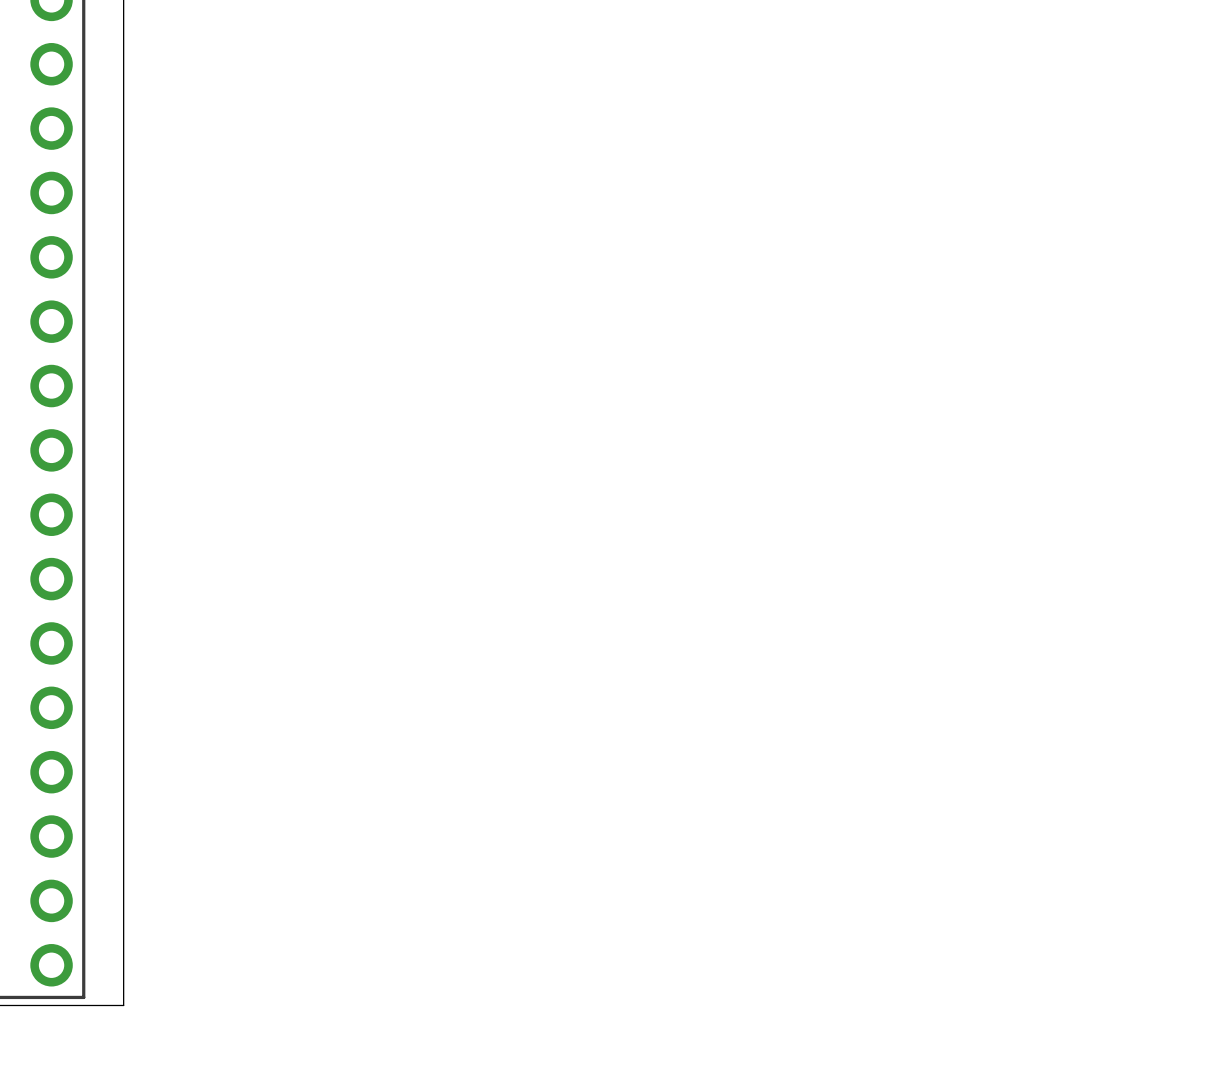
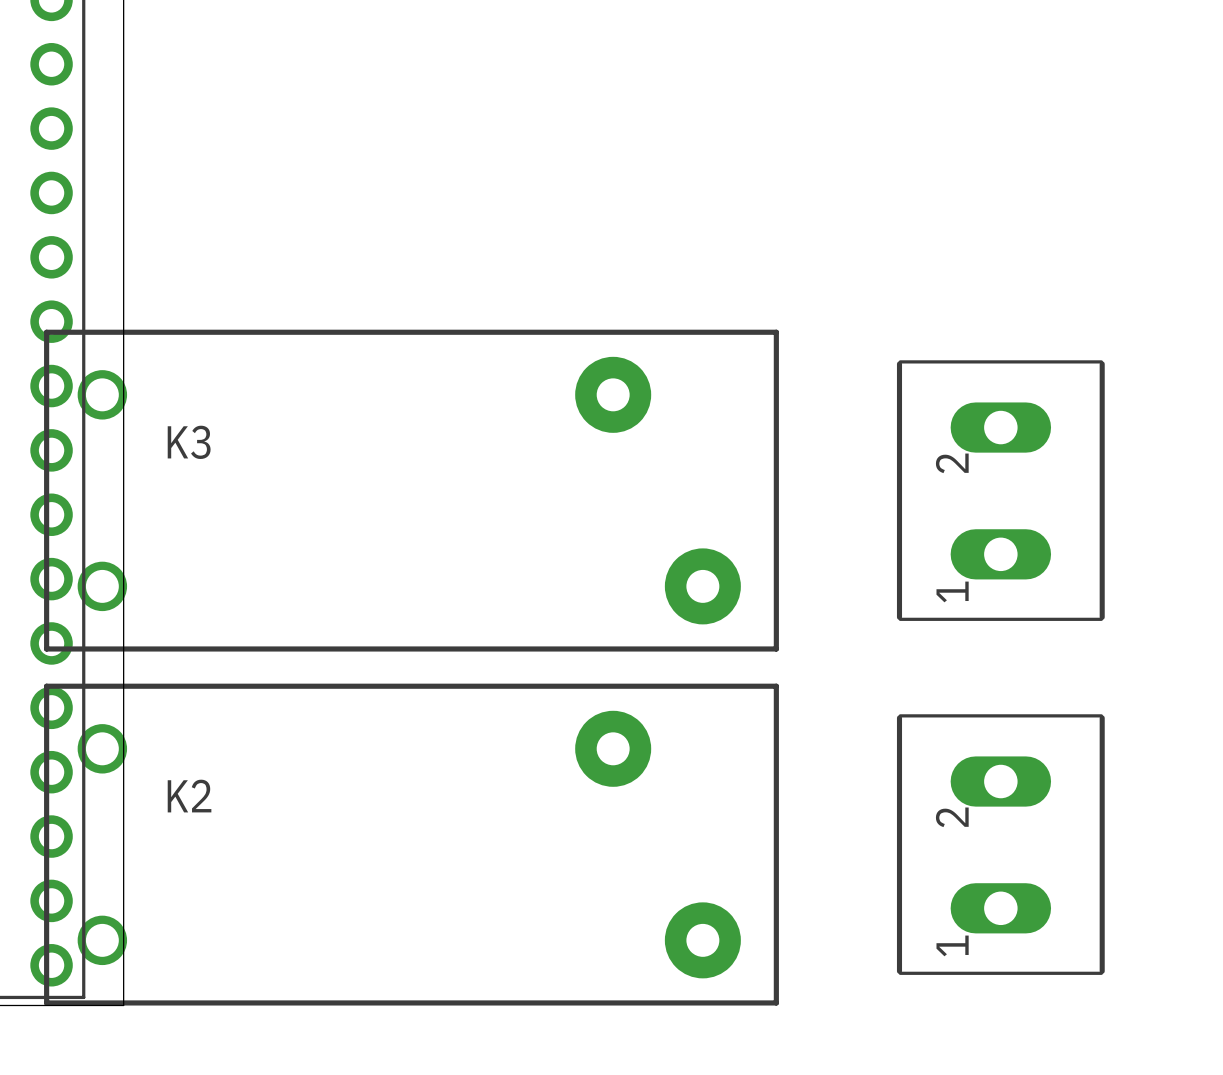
K3: none -> (411, 490)
part: none -> (1000, 490)
K2: none -> (411, 844)
part: none -> (1000, 844)

